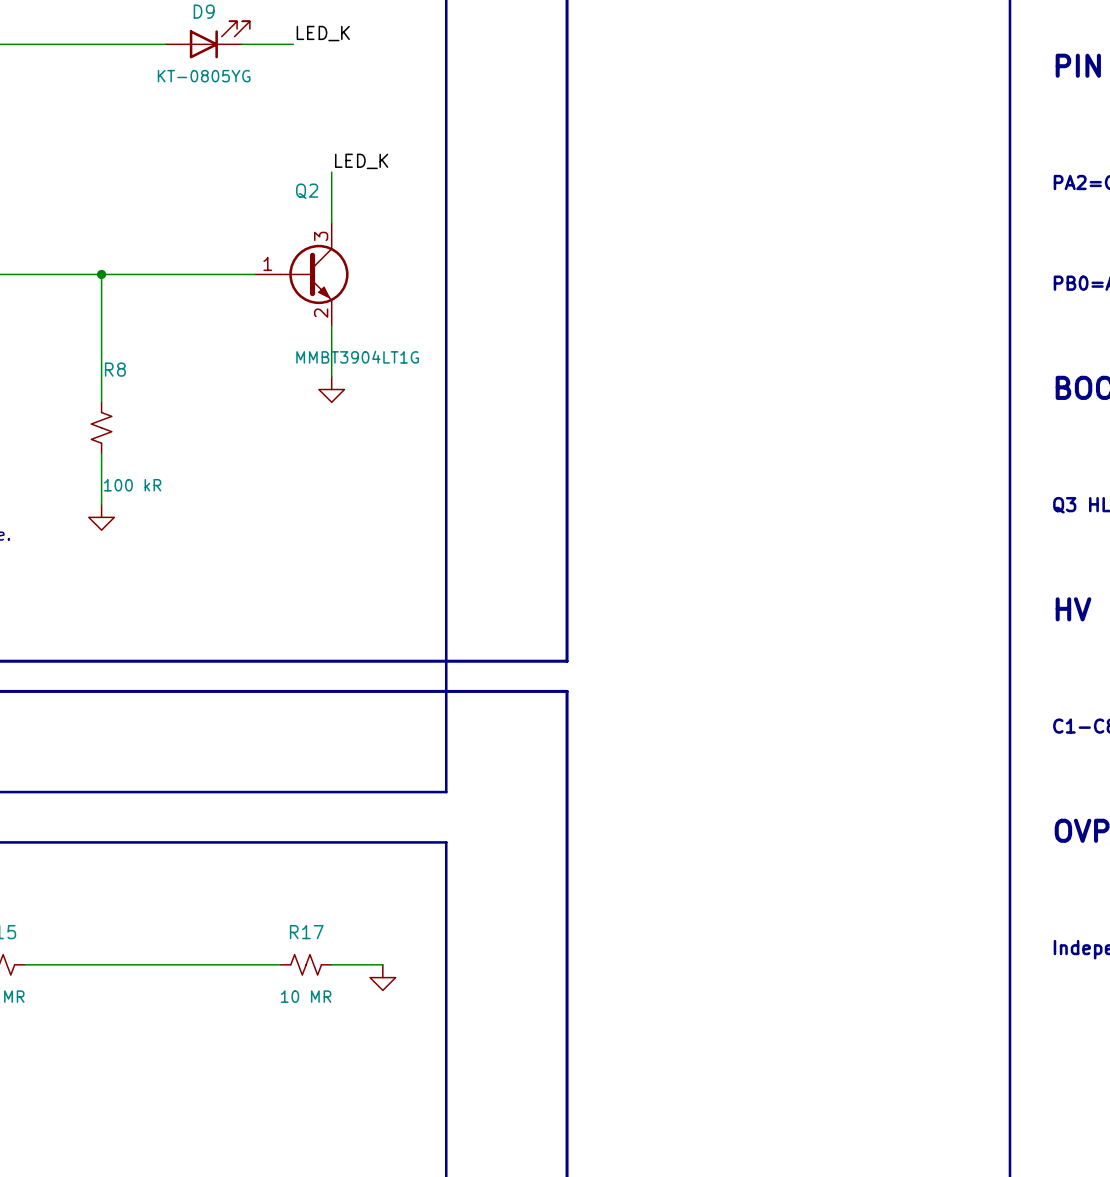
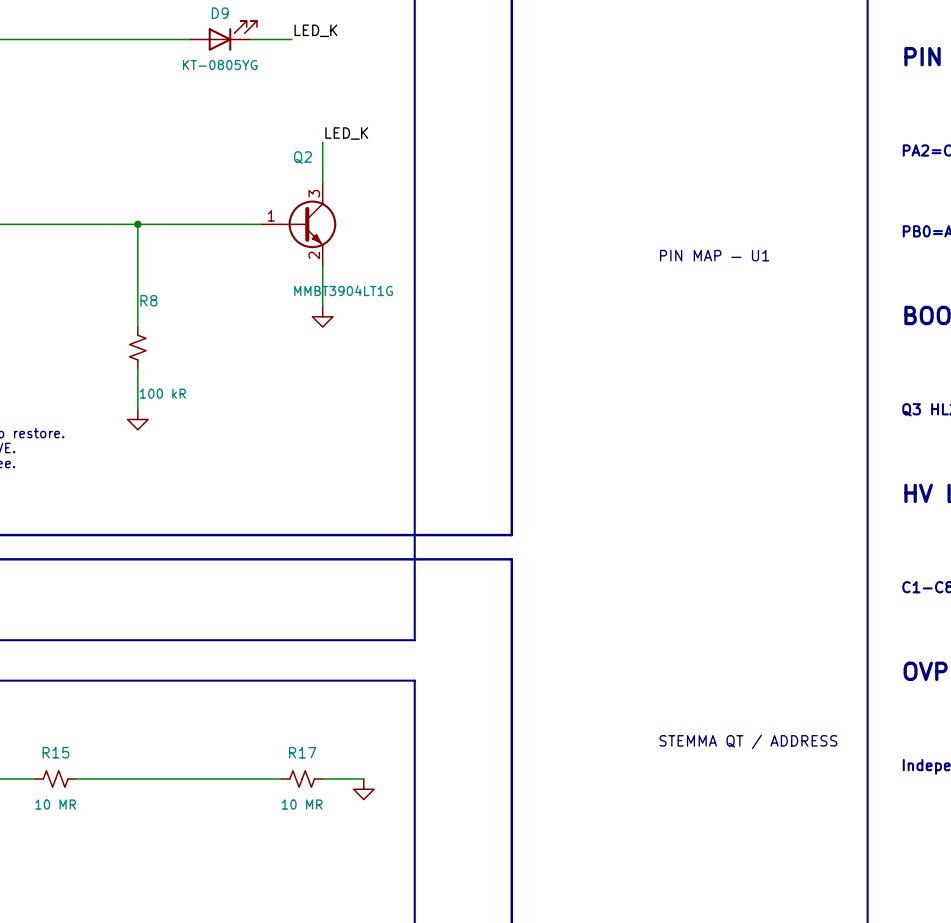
text: none -> PIN MAP — U1 (714, 255)
text: none -> STEMMA QT / ADDRESS (748, 741)

